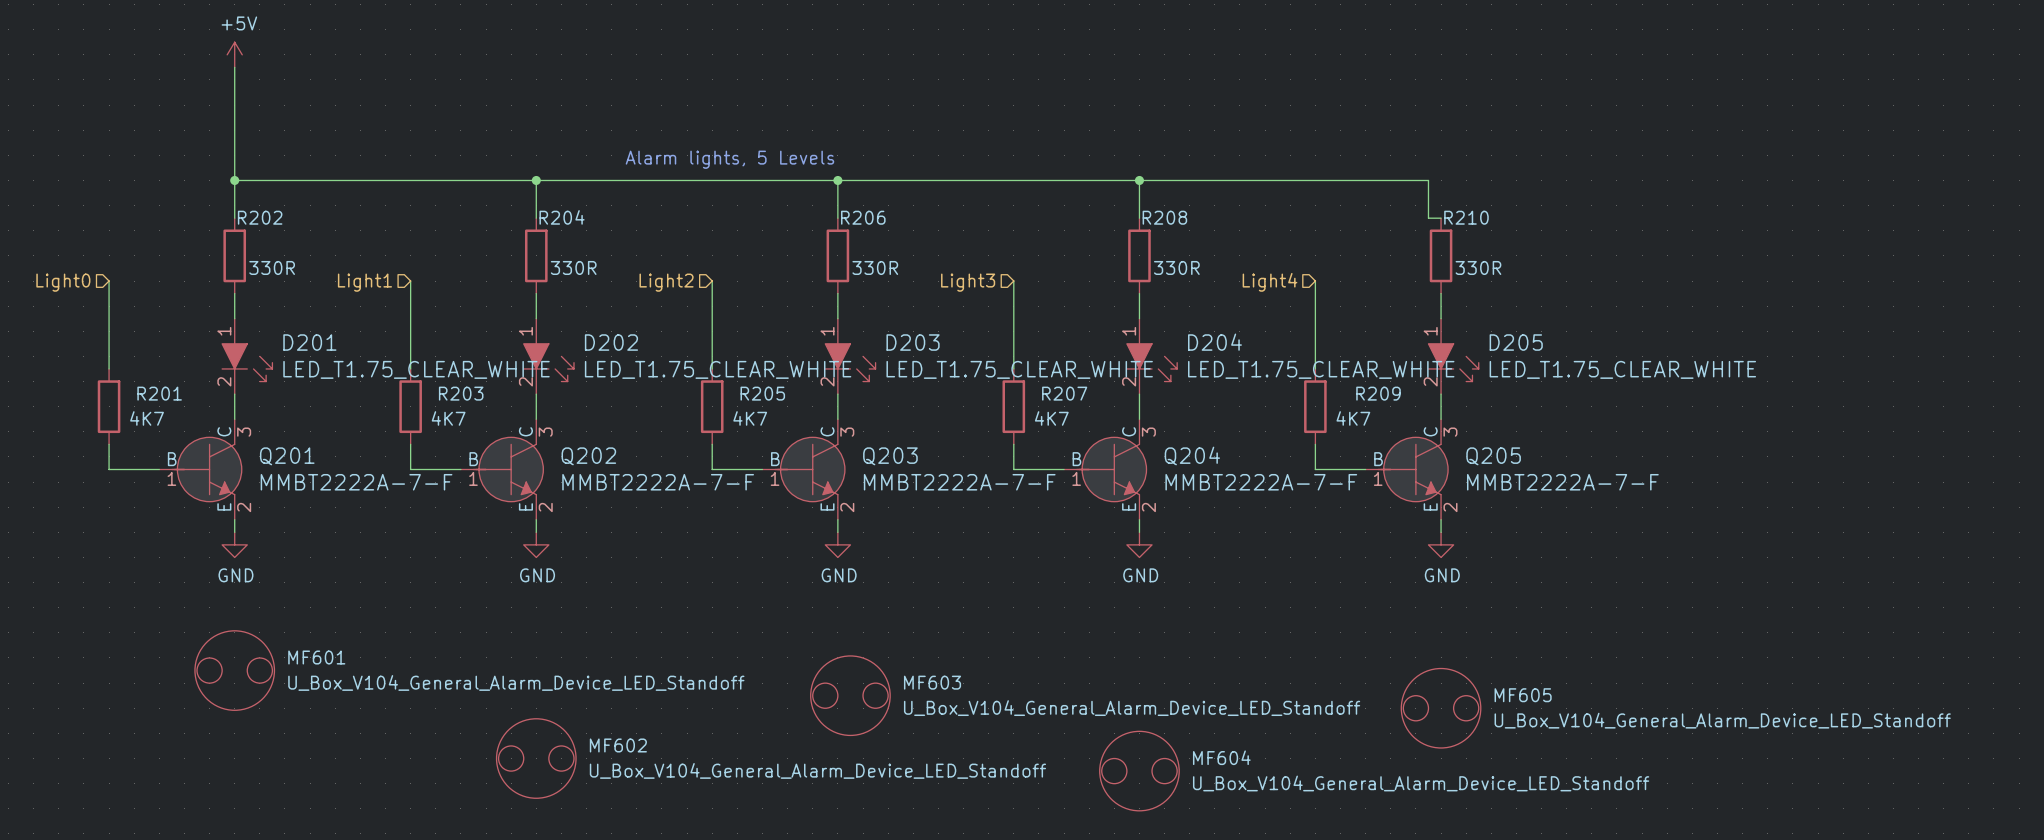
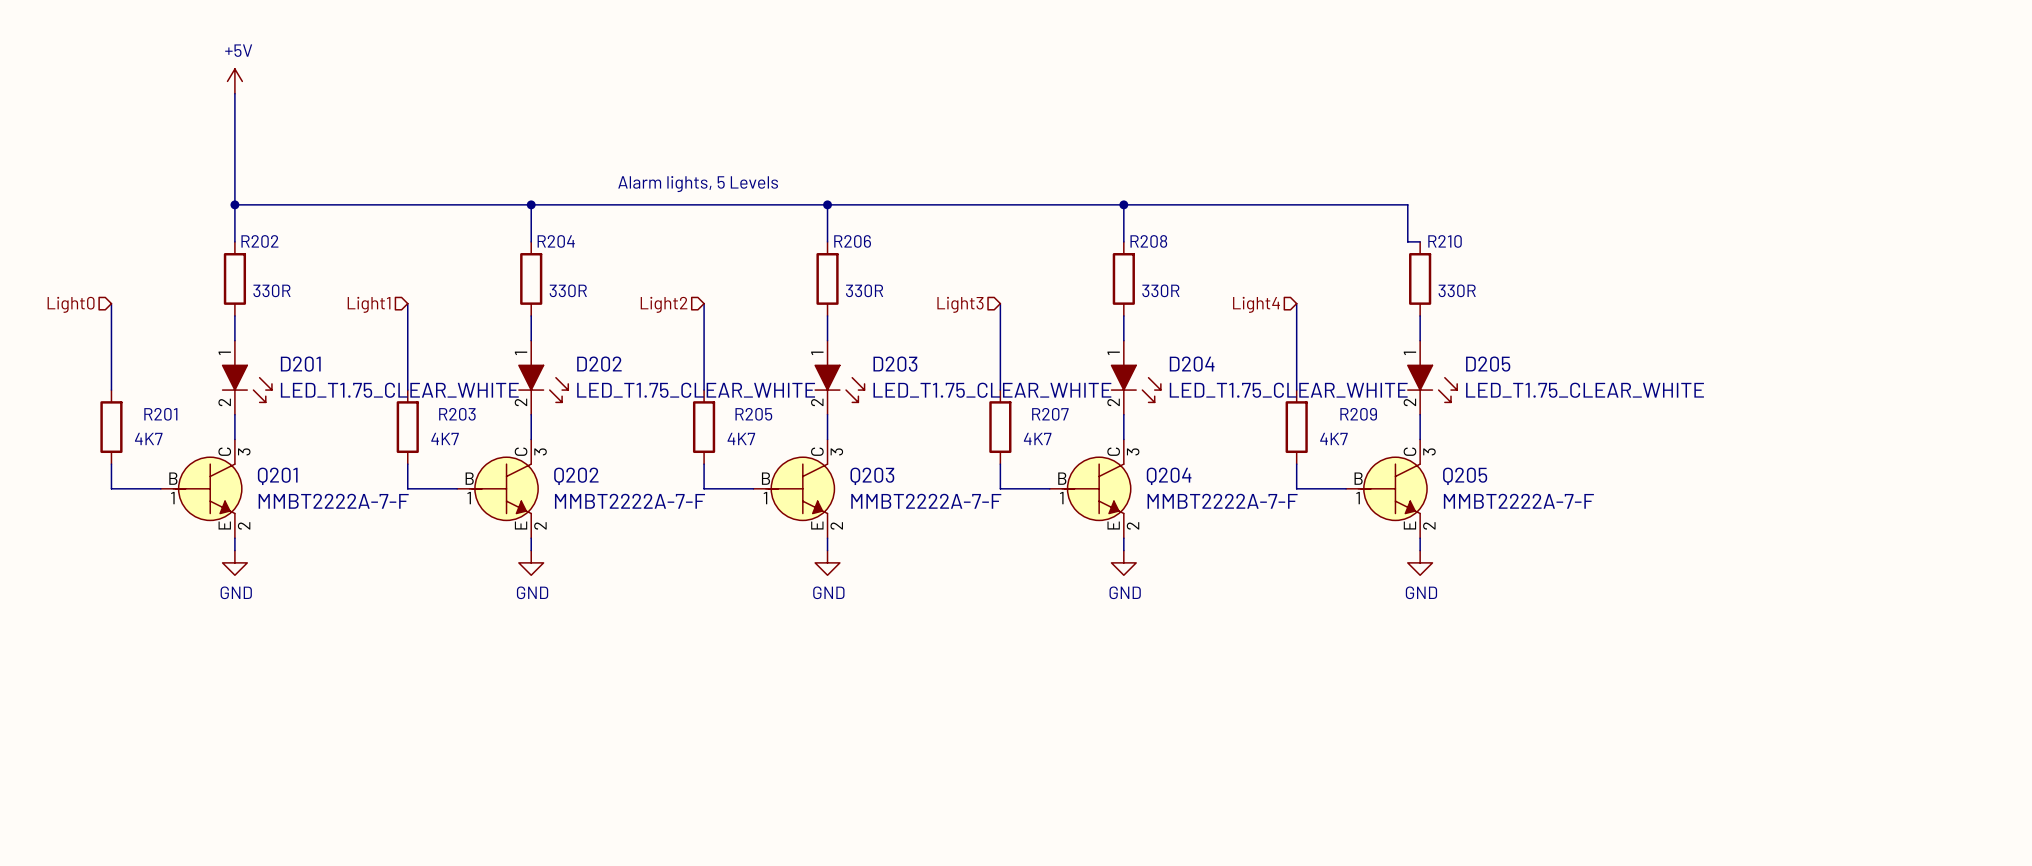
MF601: U_Box_V104_General_Alarm_Device_LED_Standoff (234, 670) -> none
MF603: U_Box_V104_General_Alarm_Device_LED_Standoff (850, 695) -> none
MF605: U_Box_V104_General_Alarm_Device_LED_Standoff (1441, 708) -> none
MF602: U_Box_V104_General_Alarm_Device_LED_Standoff (536, 758) -> none
MF604: U_Box_V104_General_Alarm_Device_LED_Standoff (1139, 771) -> none

